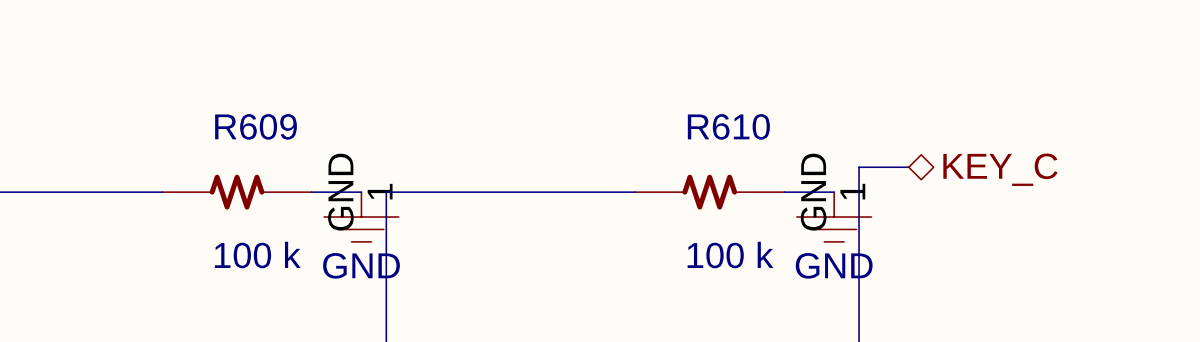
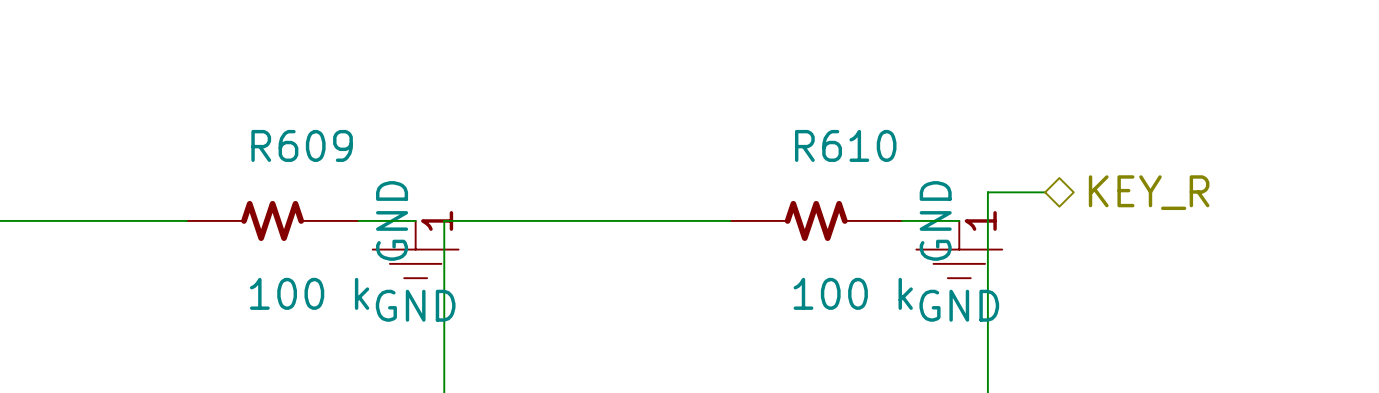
hierarchical label: KEY_C (1000, 169) -> KEY_R (1149, 192)

